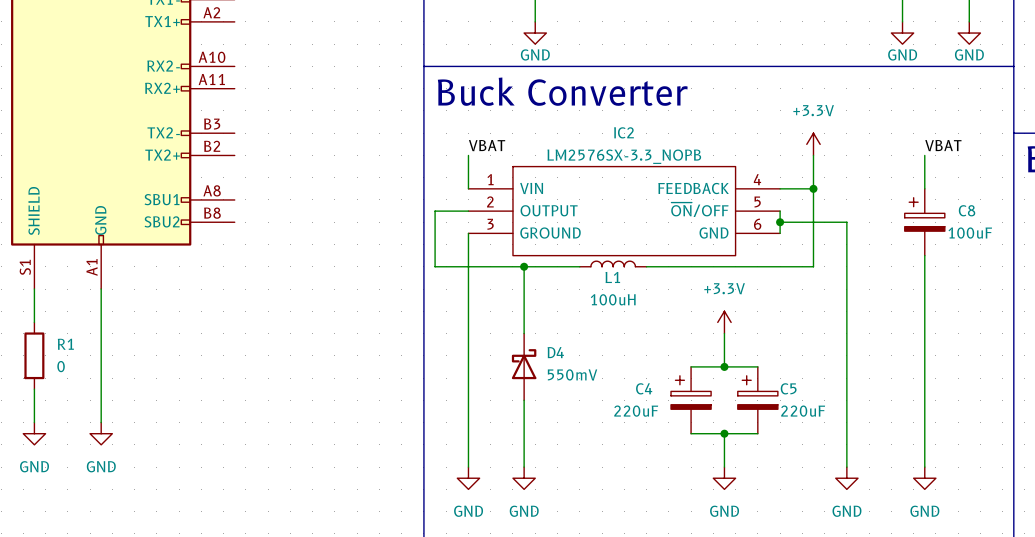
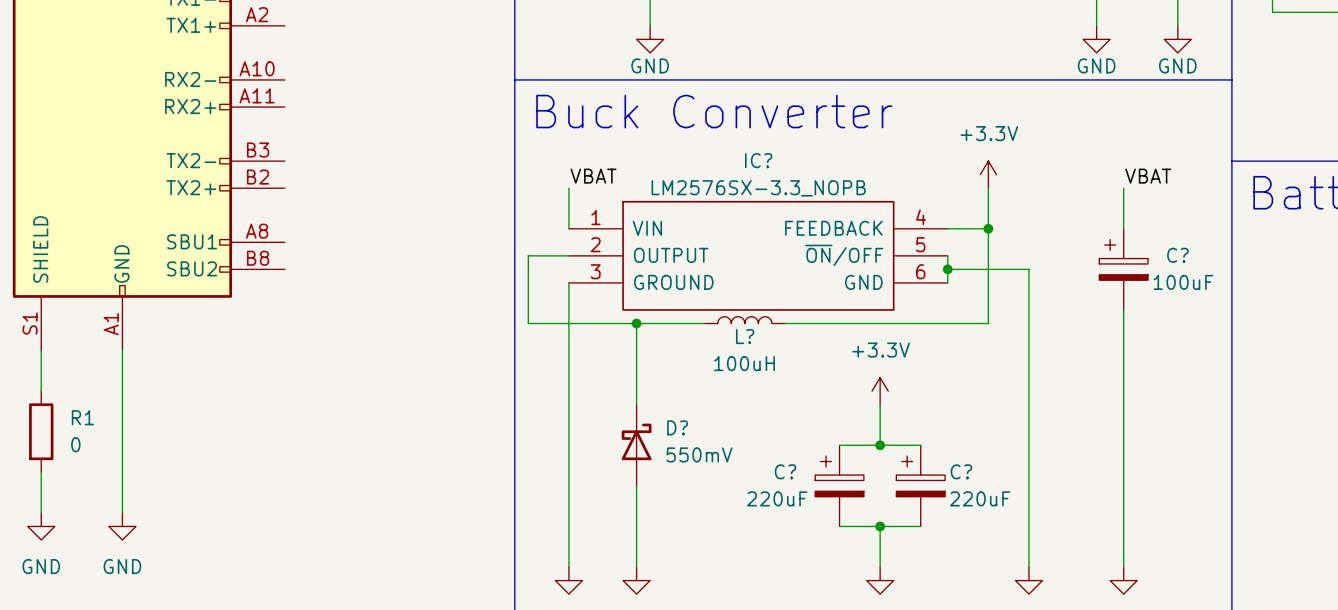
IC2 name: IC2 (623, 132) -> IC? (758, 160)
C8 name: C8 (967, 210) -> C? (1177, 255)
L1 name: L1 (612, 277) -> L? (745, 336)
D4 name: D4 (555, 352) -> D? (677, 427)
C4 name: C4 (644, 388) -> C? (785, 471)
C5 name: C5 (788, 388) -> C? (961, 471)

